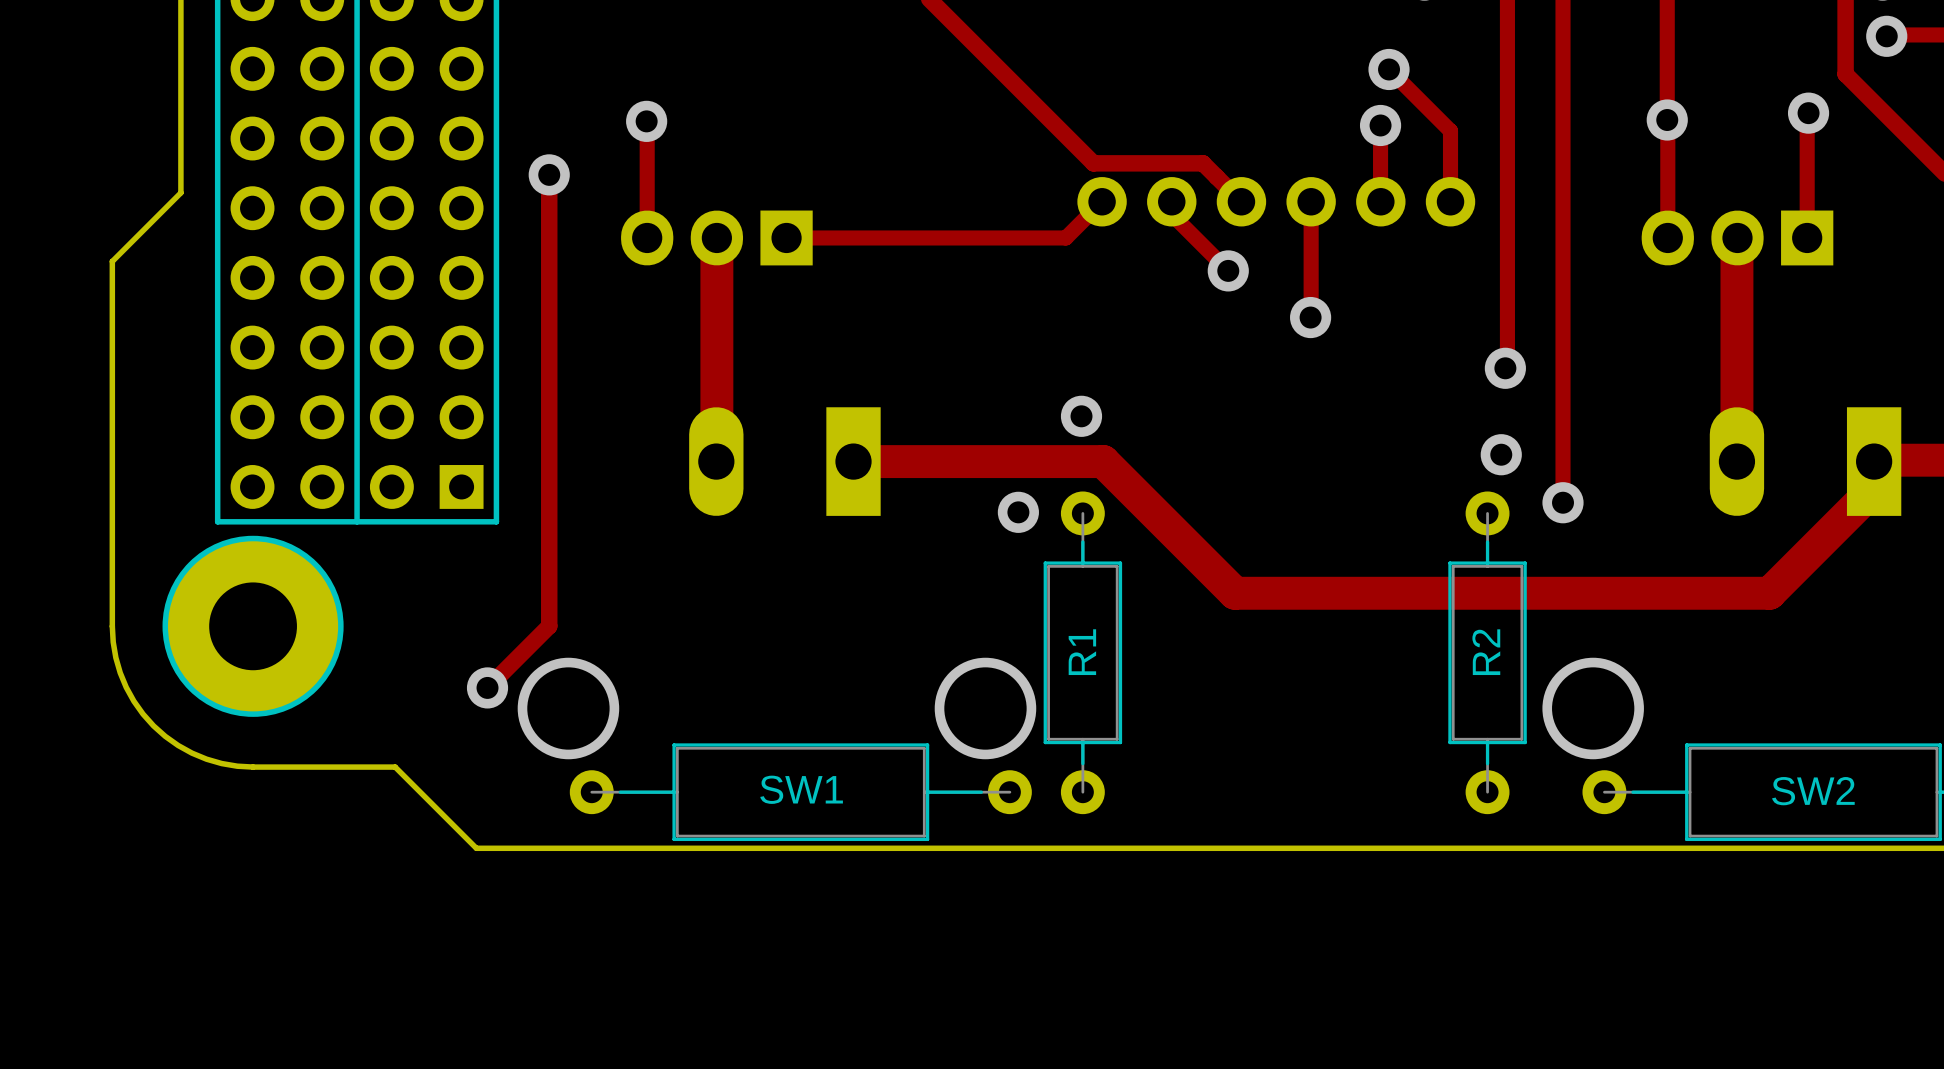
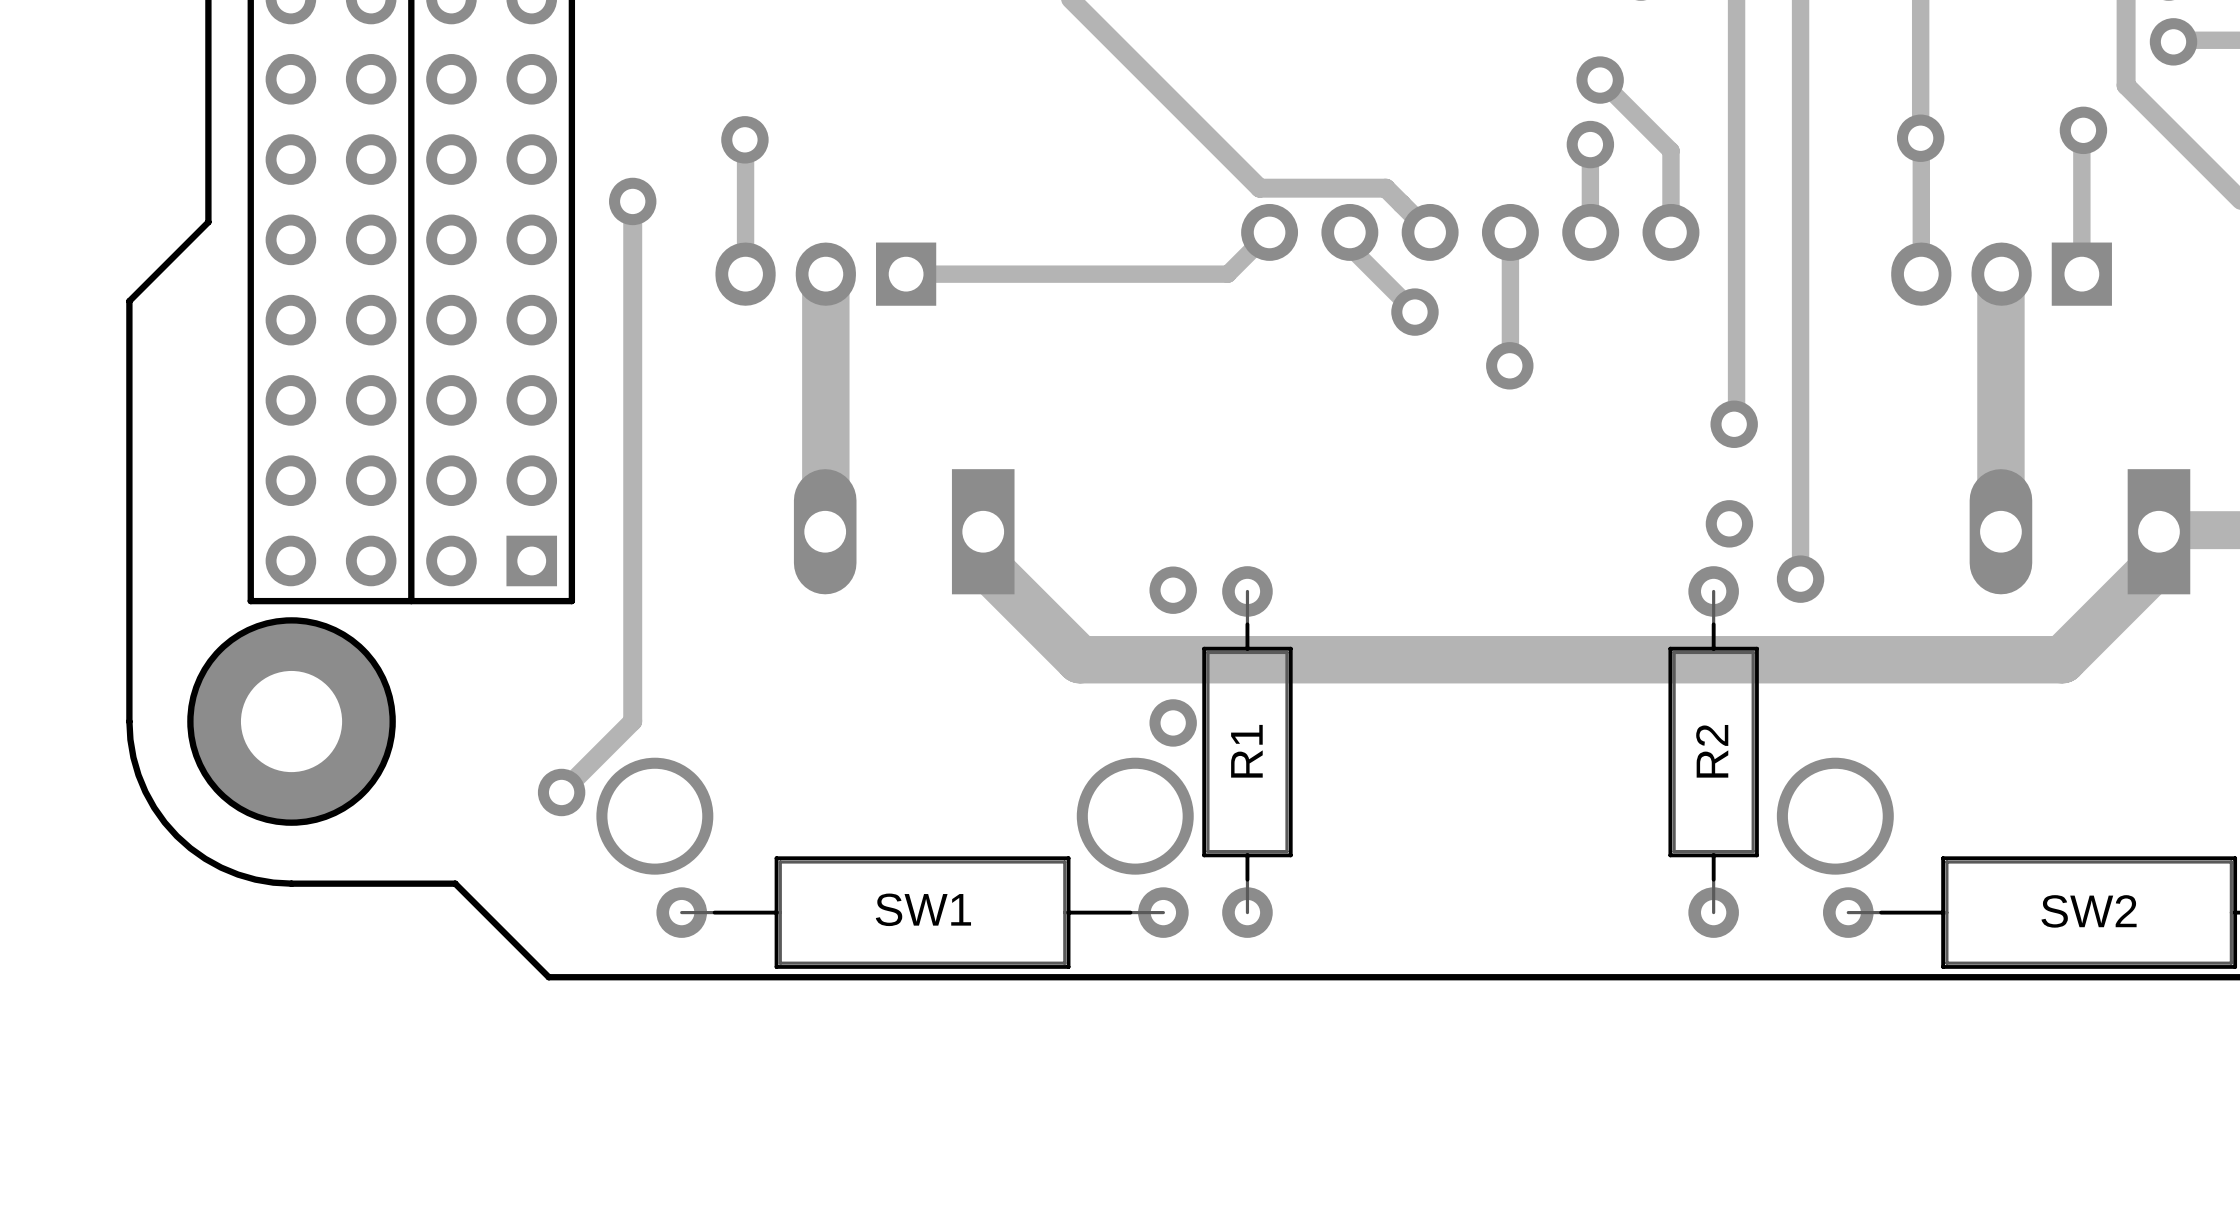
track width: thin (716, 237) (716, 461) -> thick (825, 274) (825, 531)
track width: thin (1736, 238) (1736, 461) -> thick (2000, 274) (2000, 531)
via: (1081, 416) -> none
track: (853, 461) (1103, 461) (1234, 593) (1769, 593) (1790, 572) -> (983, 531) (983, 563) (1079, 659) (2062, 659)
track width: thin (1874, 461) (1874, 488) (1790, 572) -> thick (2158, 531) (2158, 563) (2062, 659)
via: none -> (1173, 722)

